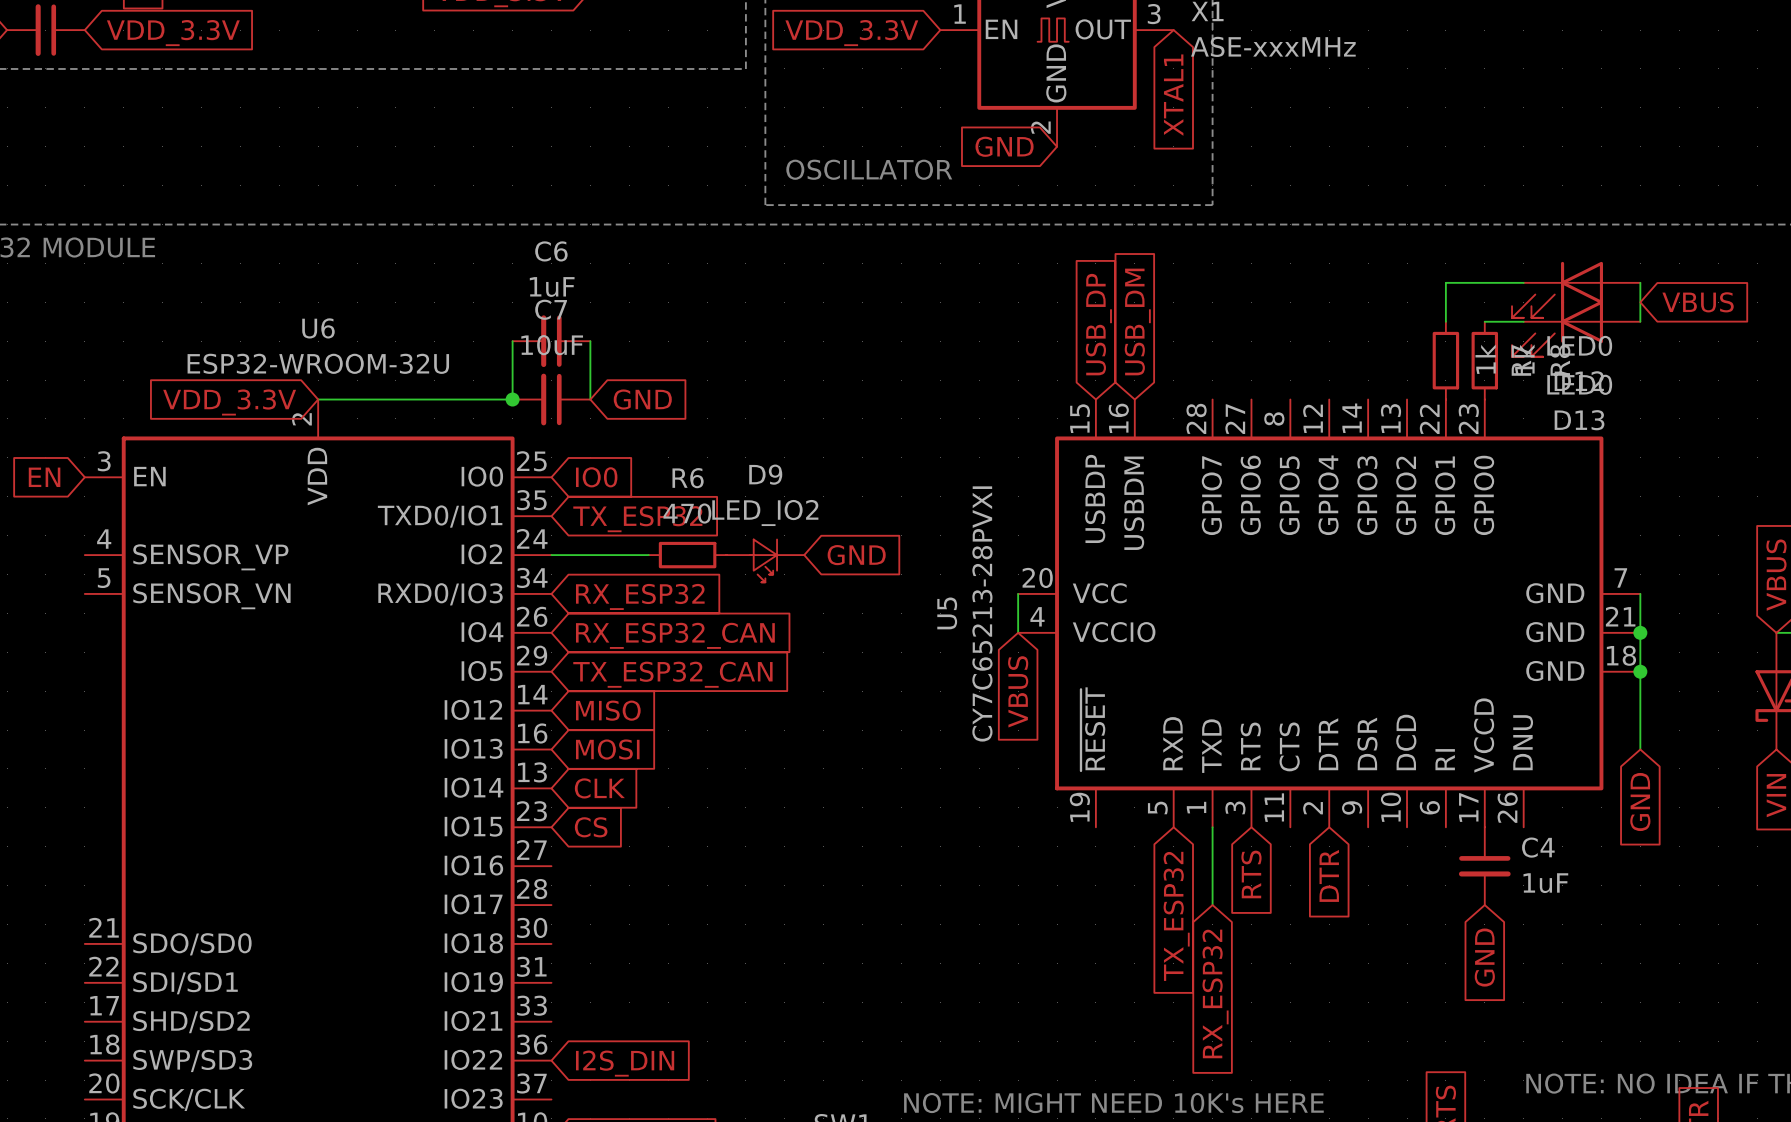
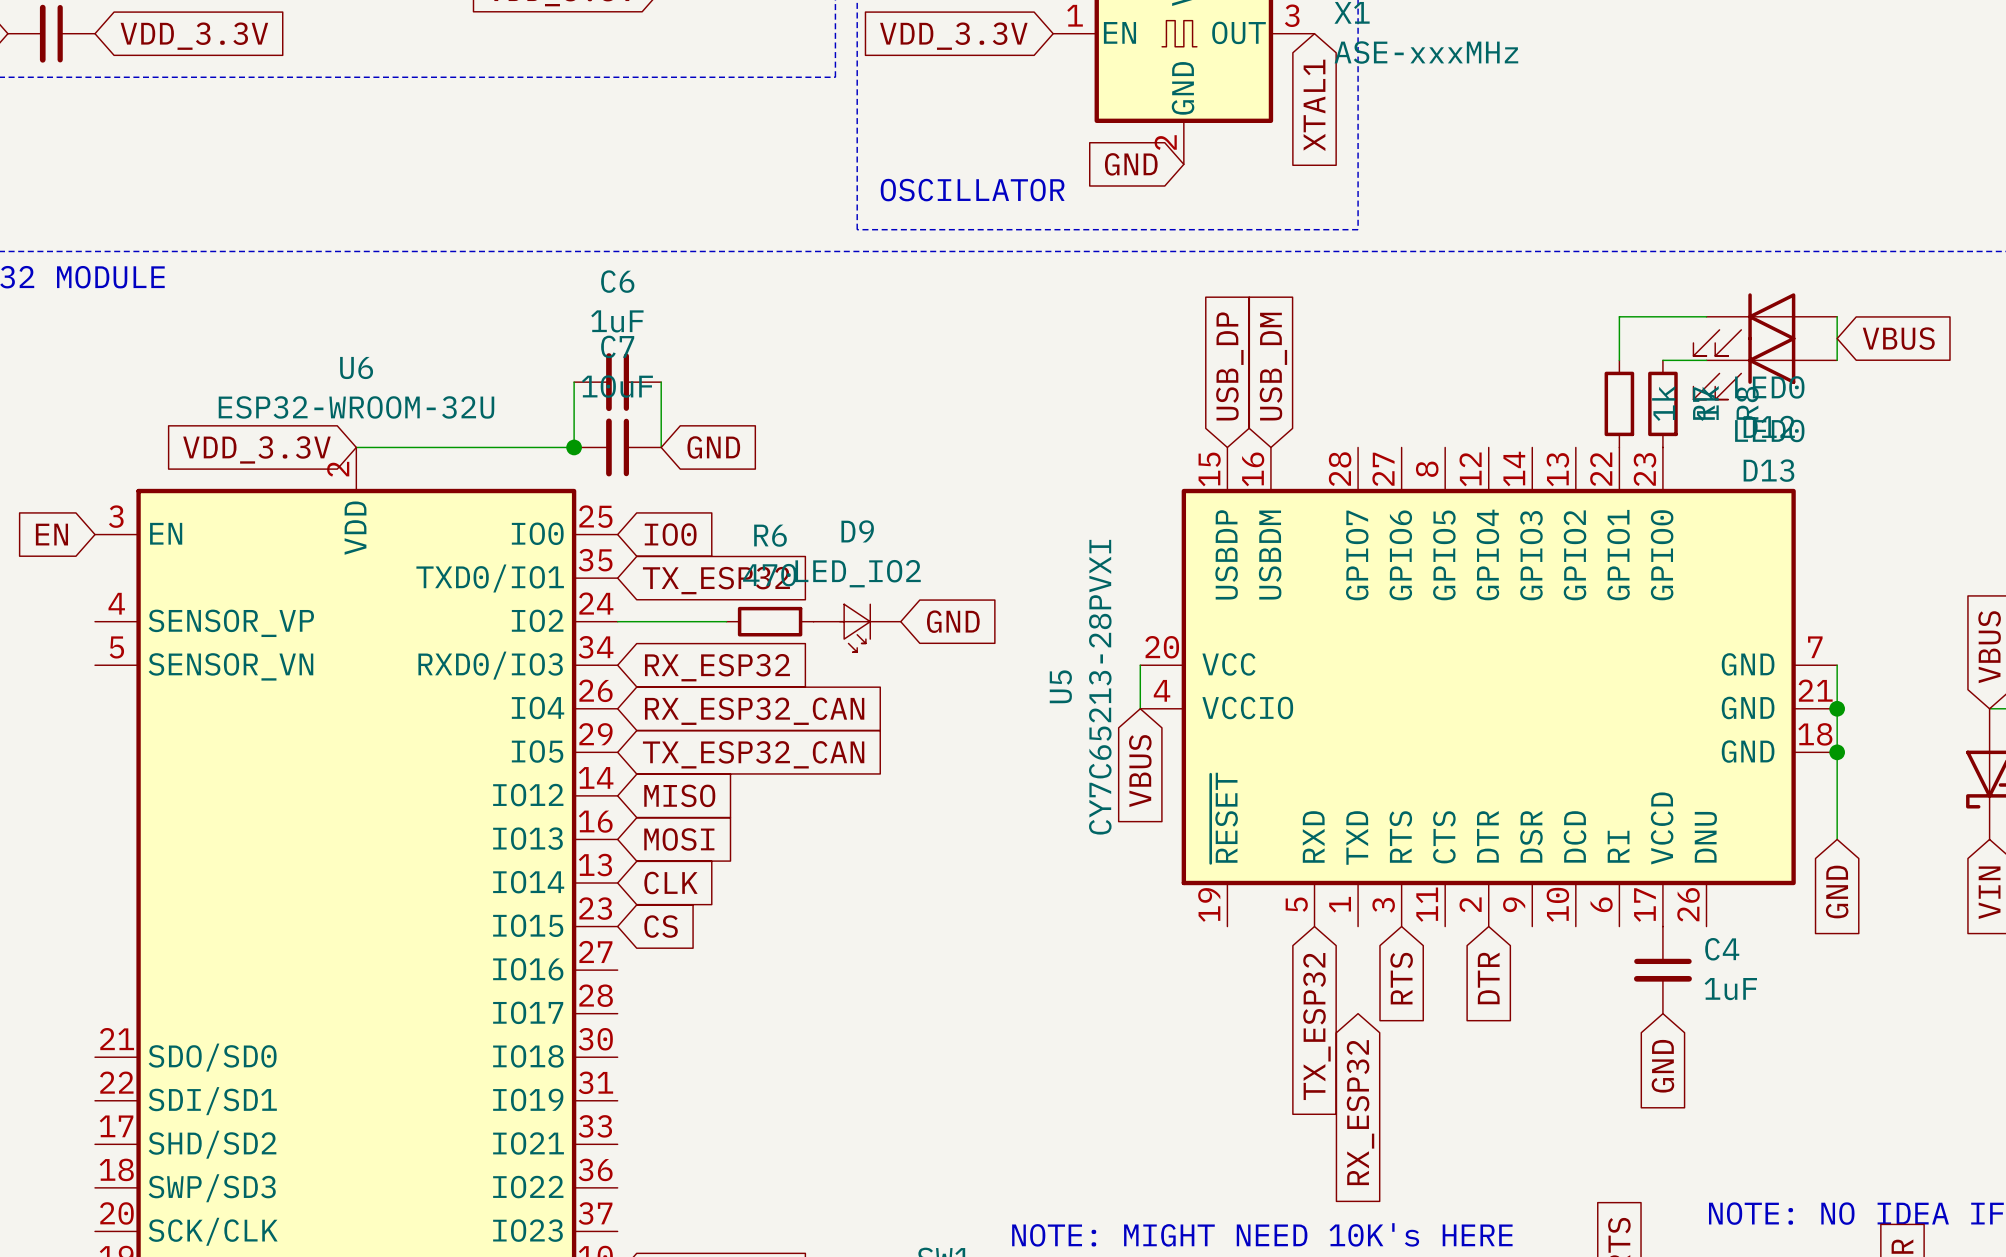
wire: (1212, 827) (1212, 905) -> none
global label: I2S_DIN (625, 1063) -> none

